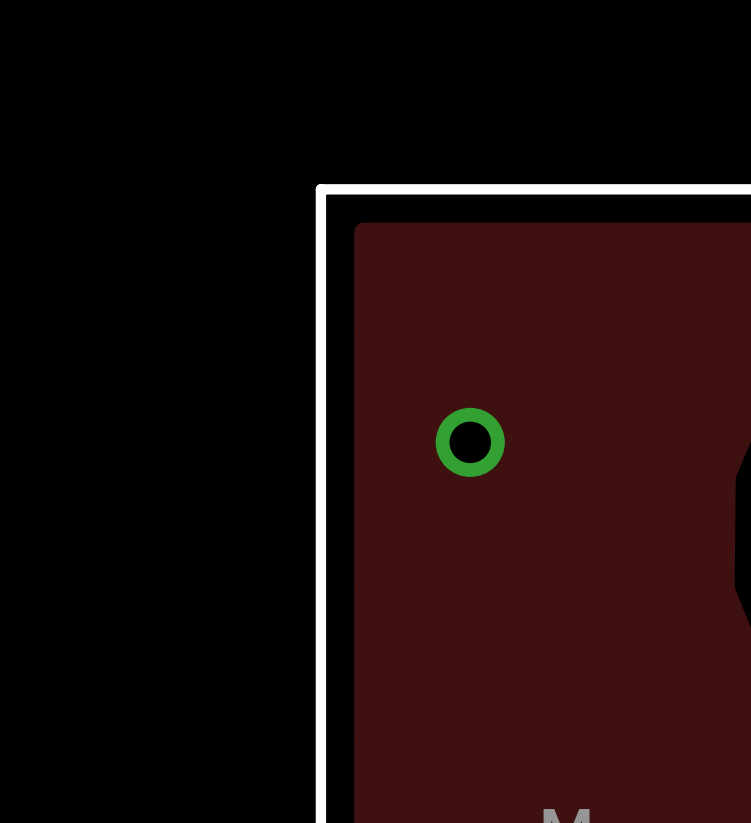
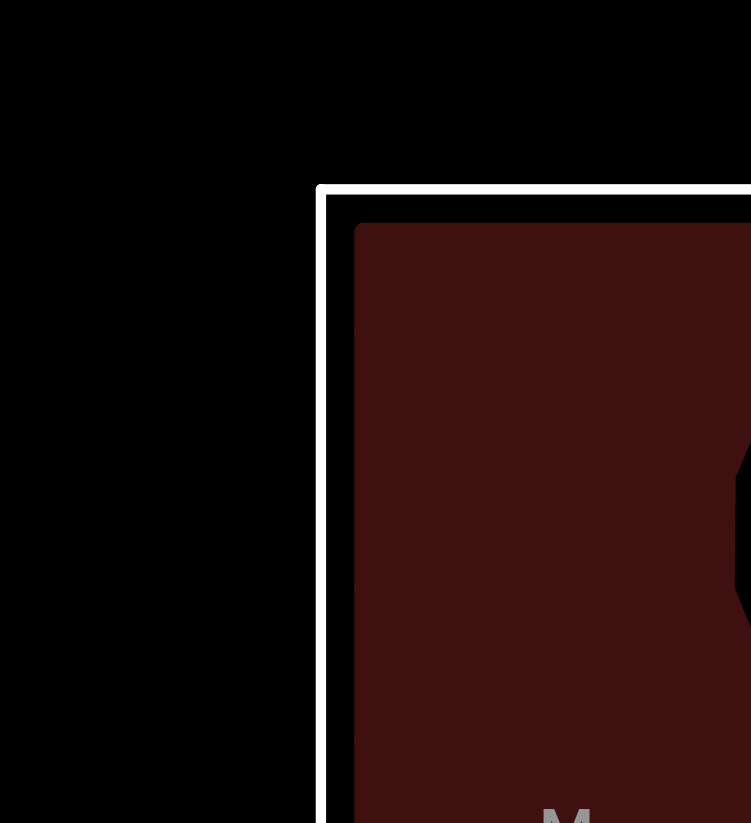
via: (470, 442) -> none

